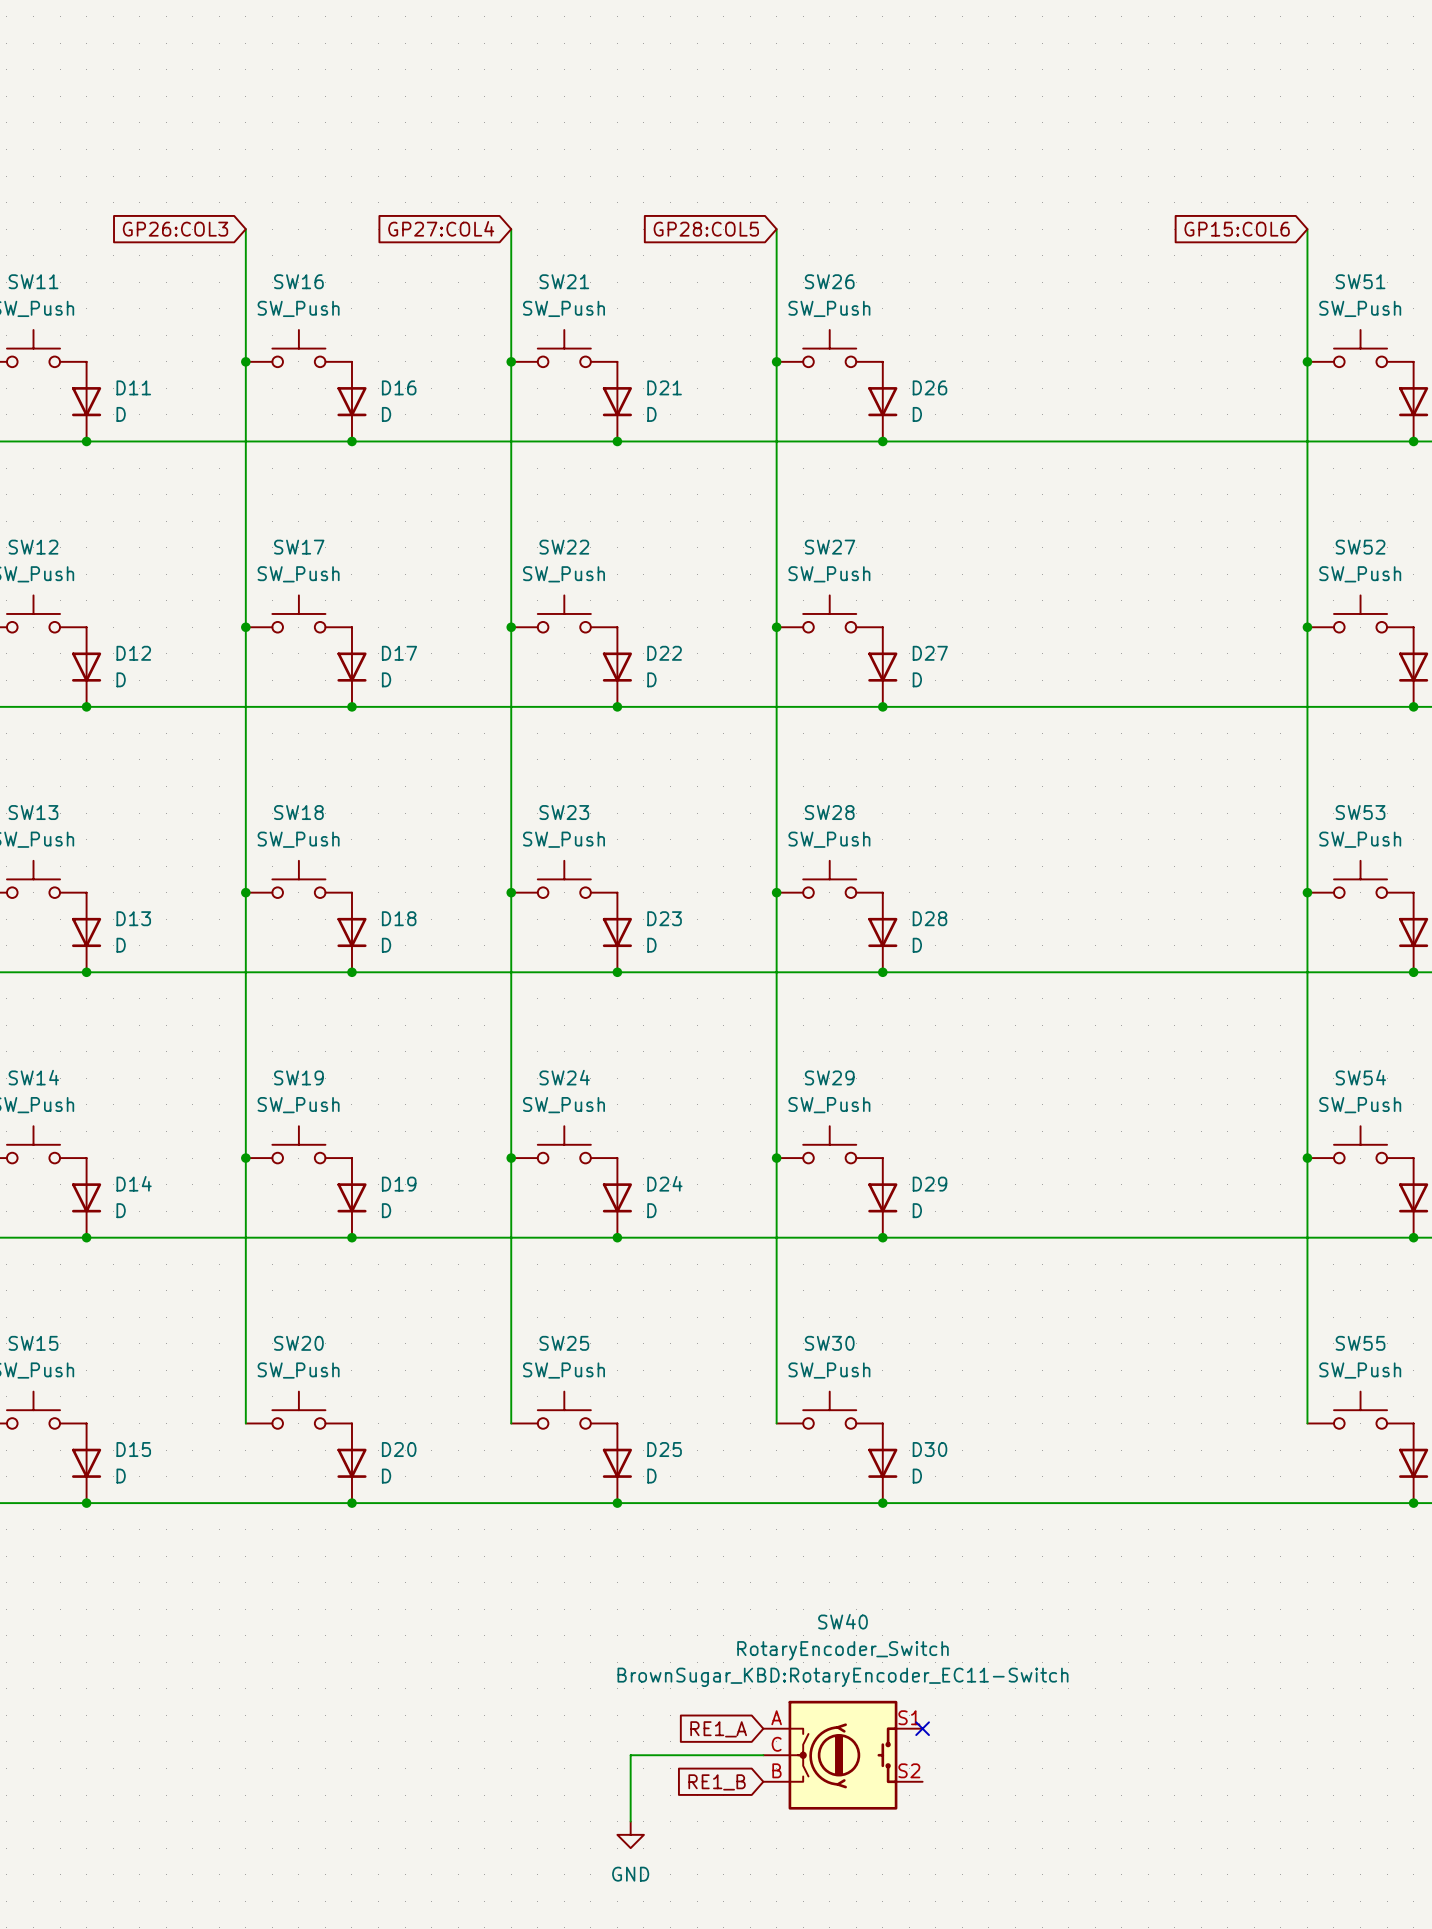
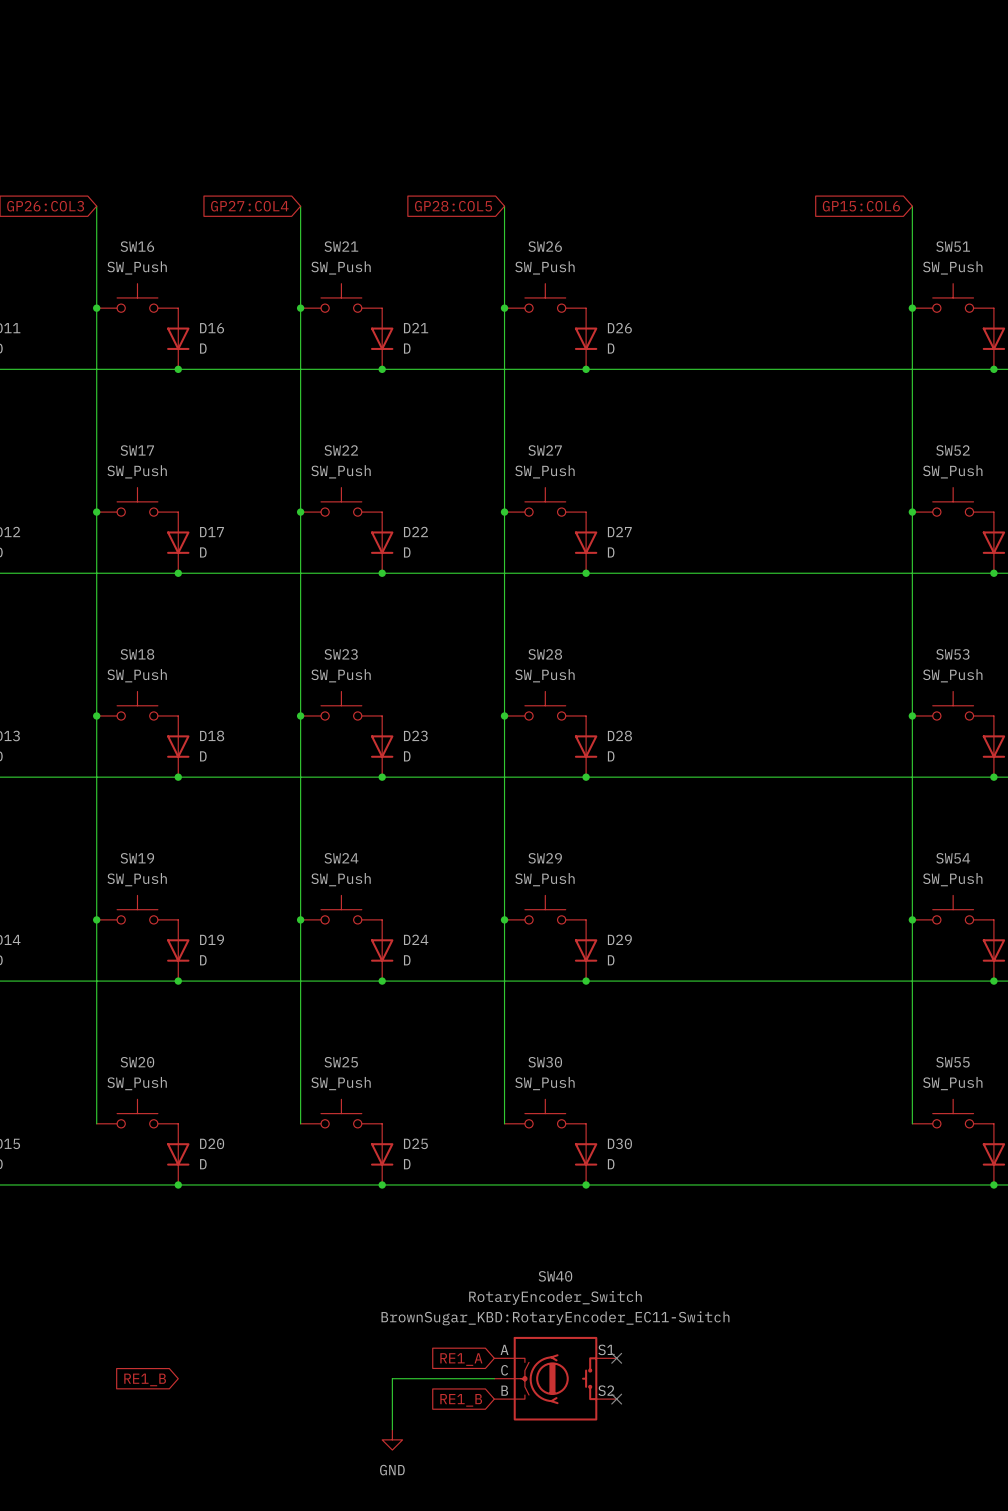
global label: none -> RE1_B (145, 1379)
no-connect mark: none -> (616, 1399)

